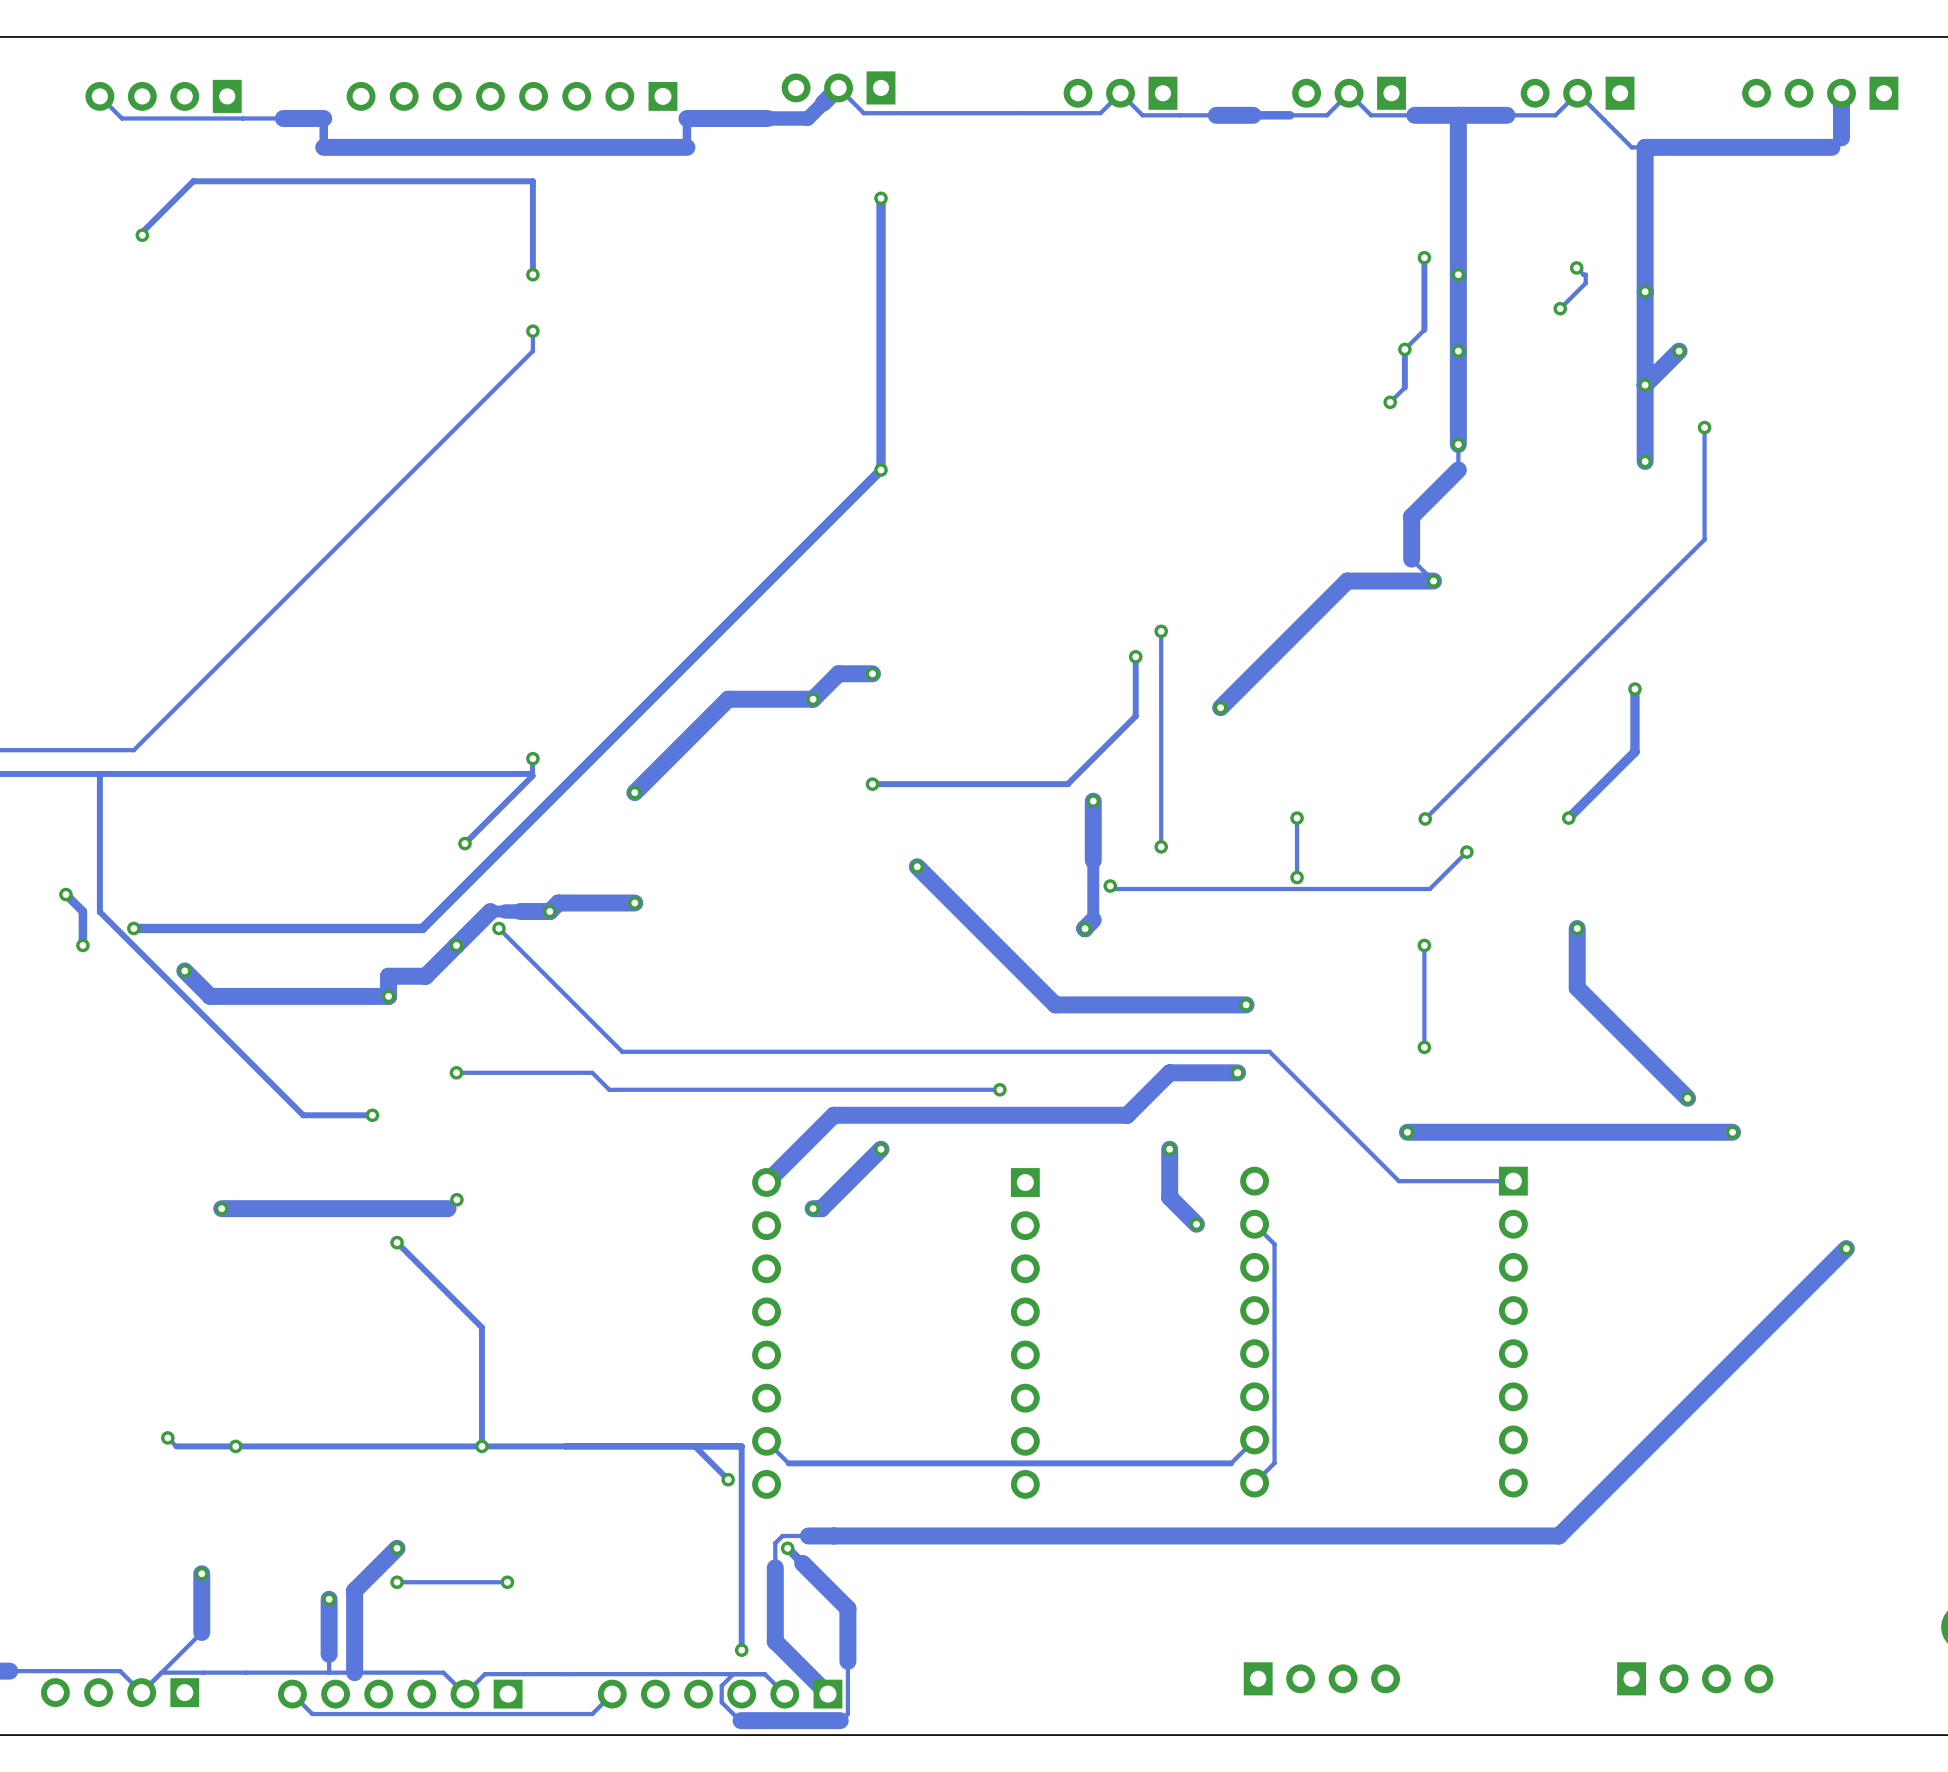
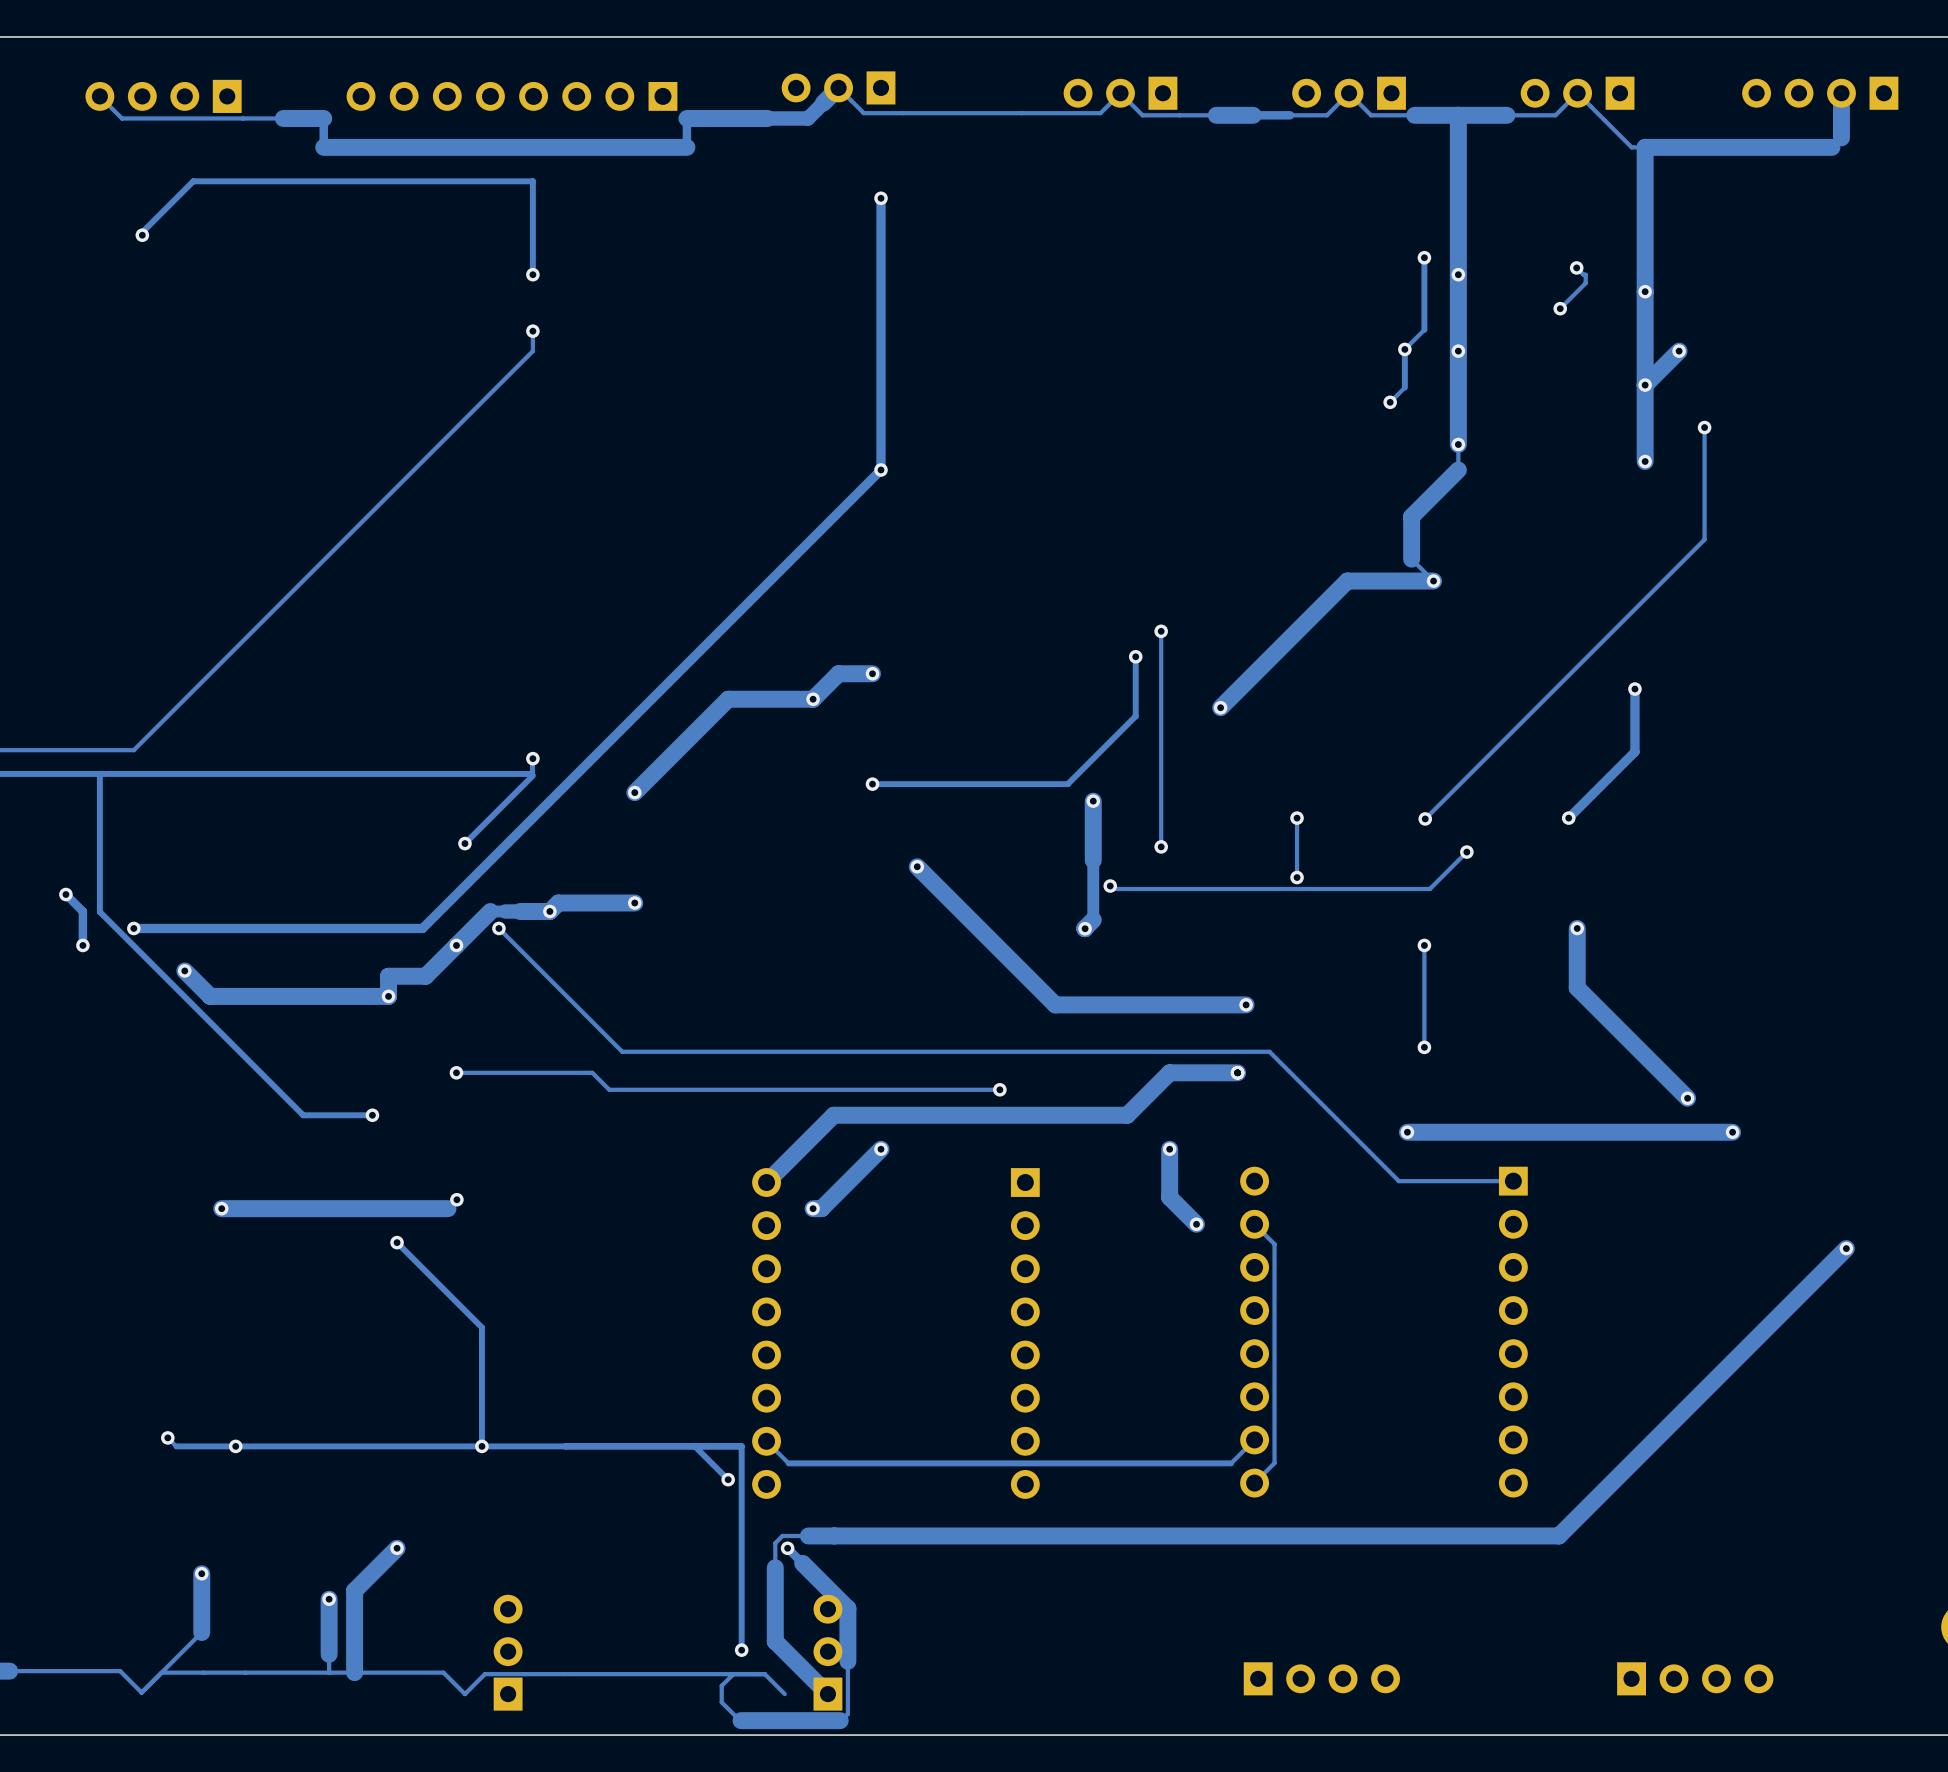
via: (397, 1582) -> none
track: (507, 1582) (397, 1582) -> none
via: (507, 1582) -> none
part: none -> (508, 1652)
part: none -> (827, 1652)
part: (120, 1692) -> none
part: (400, 1694) -> none
track: (612, 1694) (592, 1714) (312, 1714) (292, 1694) -> none
part: (720, 1694) -> none

